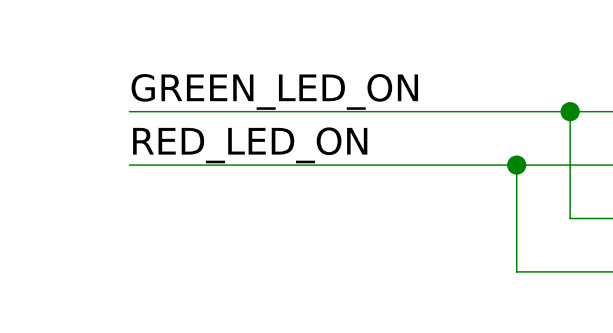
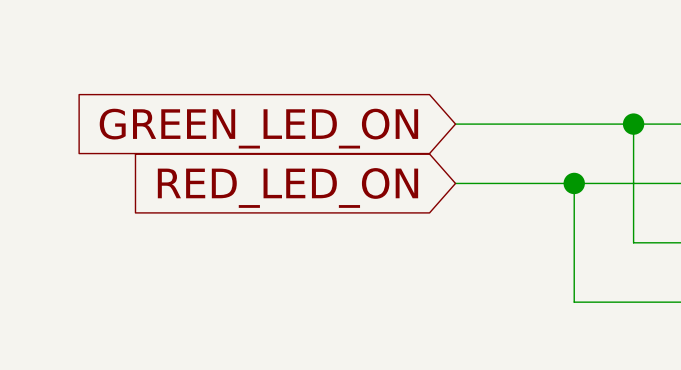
label: GREEN_LED_ON (274, 91) -> none
wire: (129, 111) (409, 111) -> none
global label: none -> GREEN_LED_ON (258, 128)
label: RED_LED_ON (250, 145) -> none
wire: (129, 165) (409, 165) -> none
global label: none -> RED_LED_ON (287, 187)

